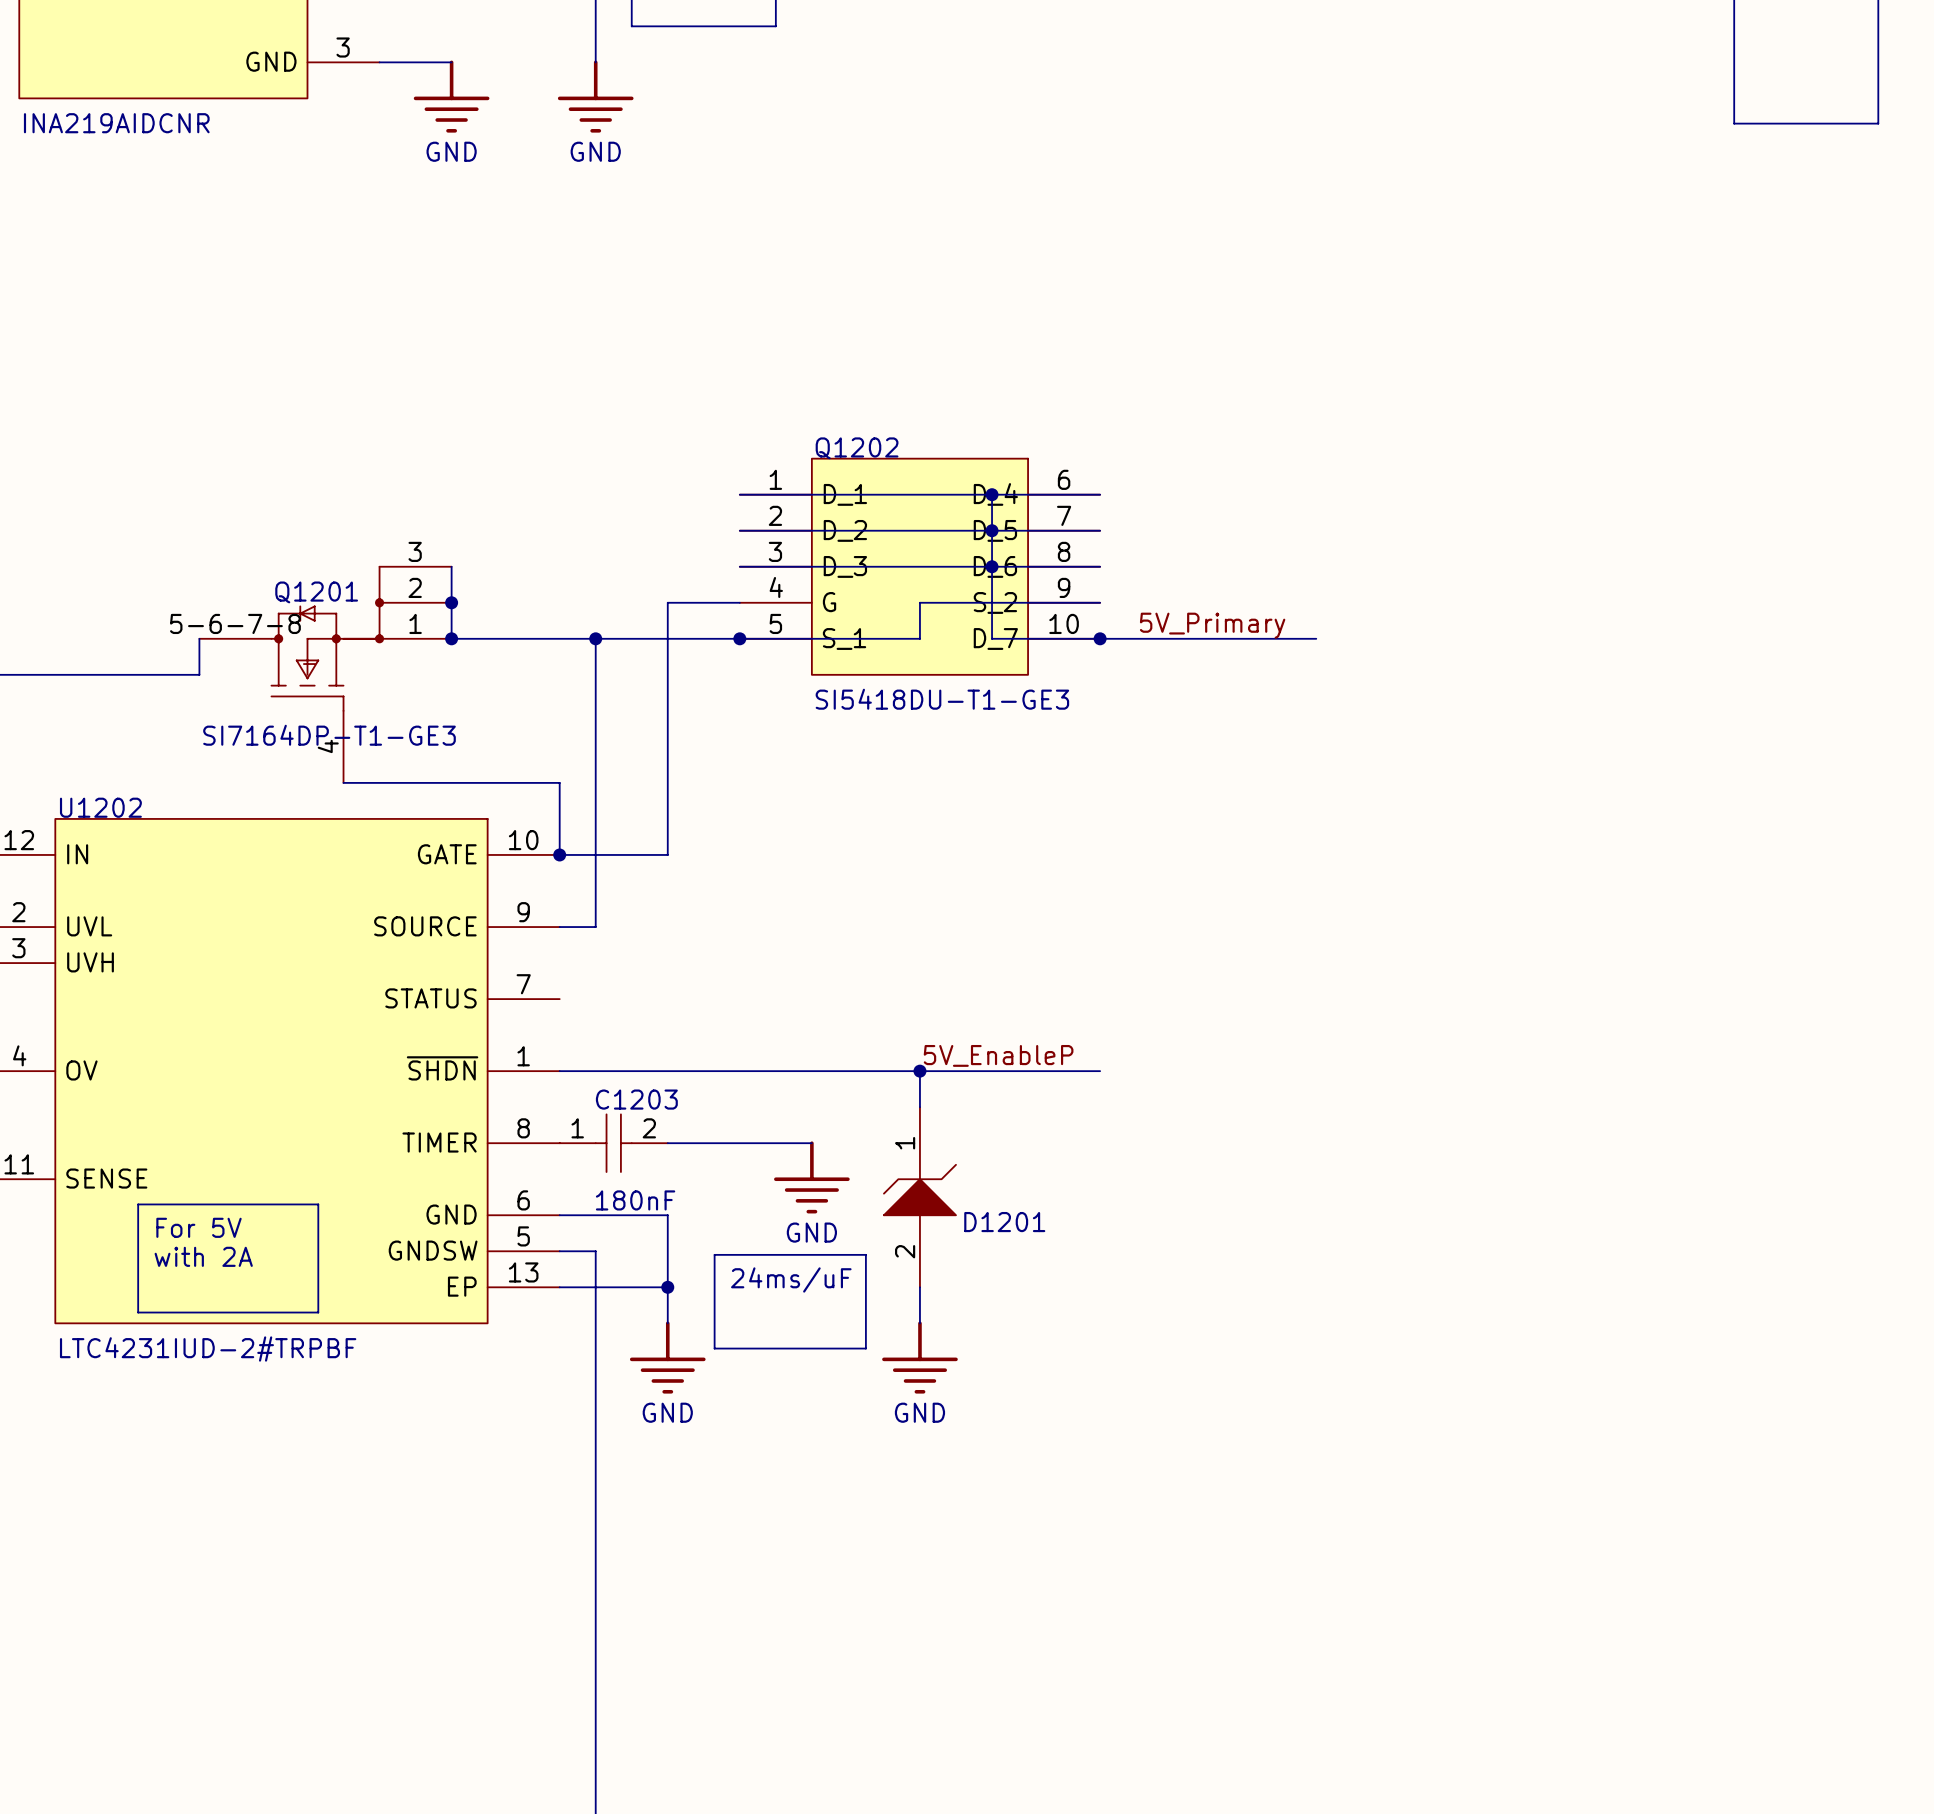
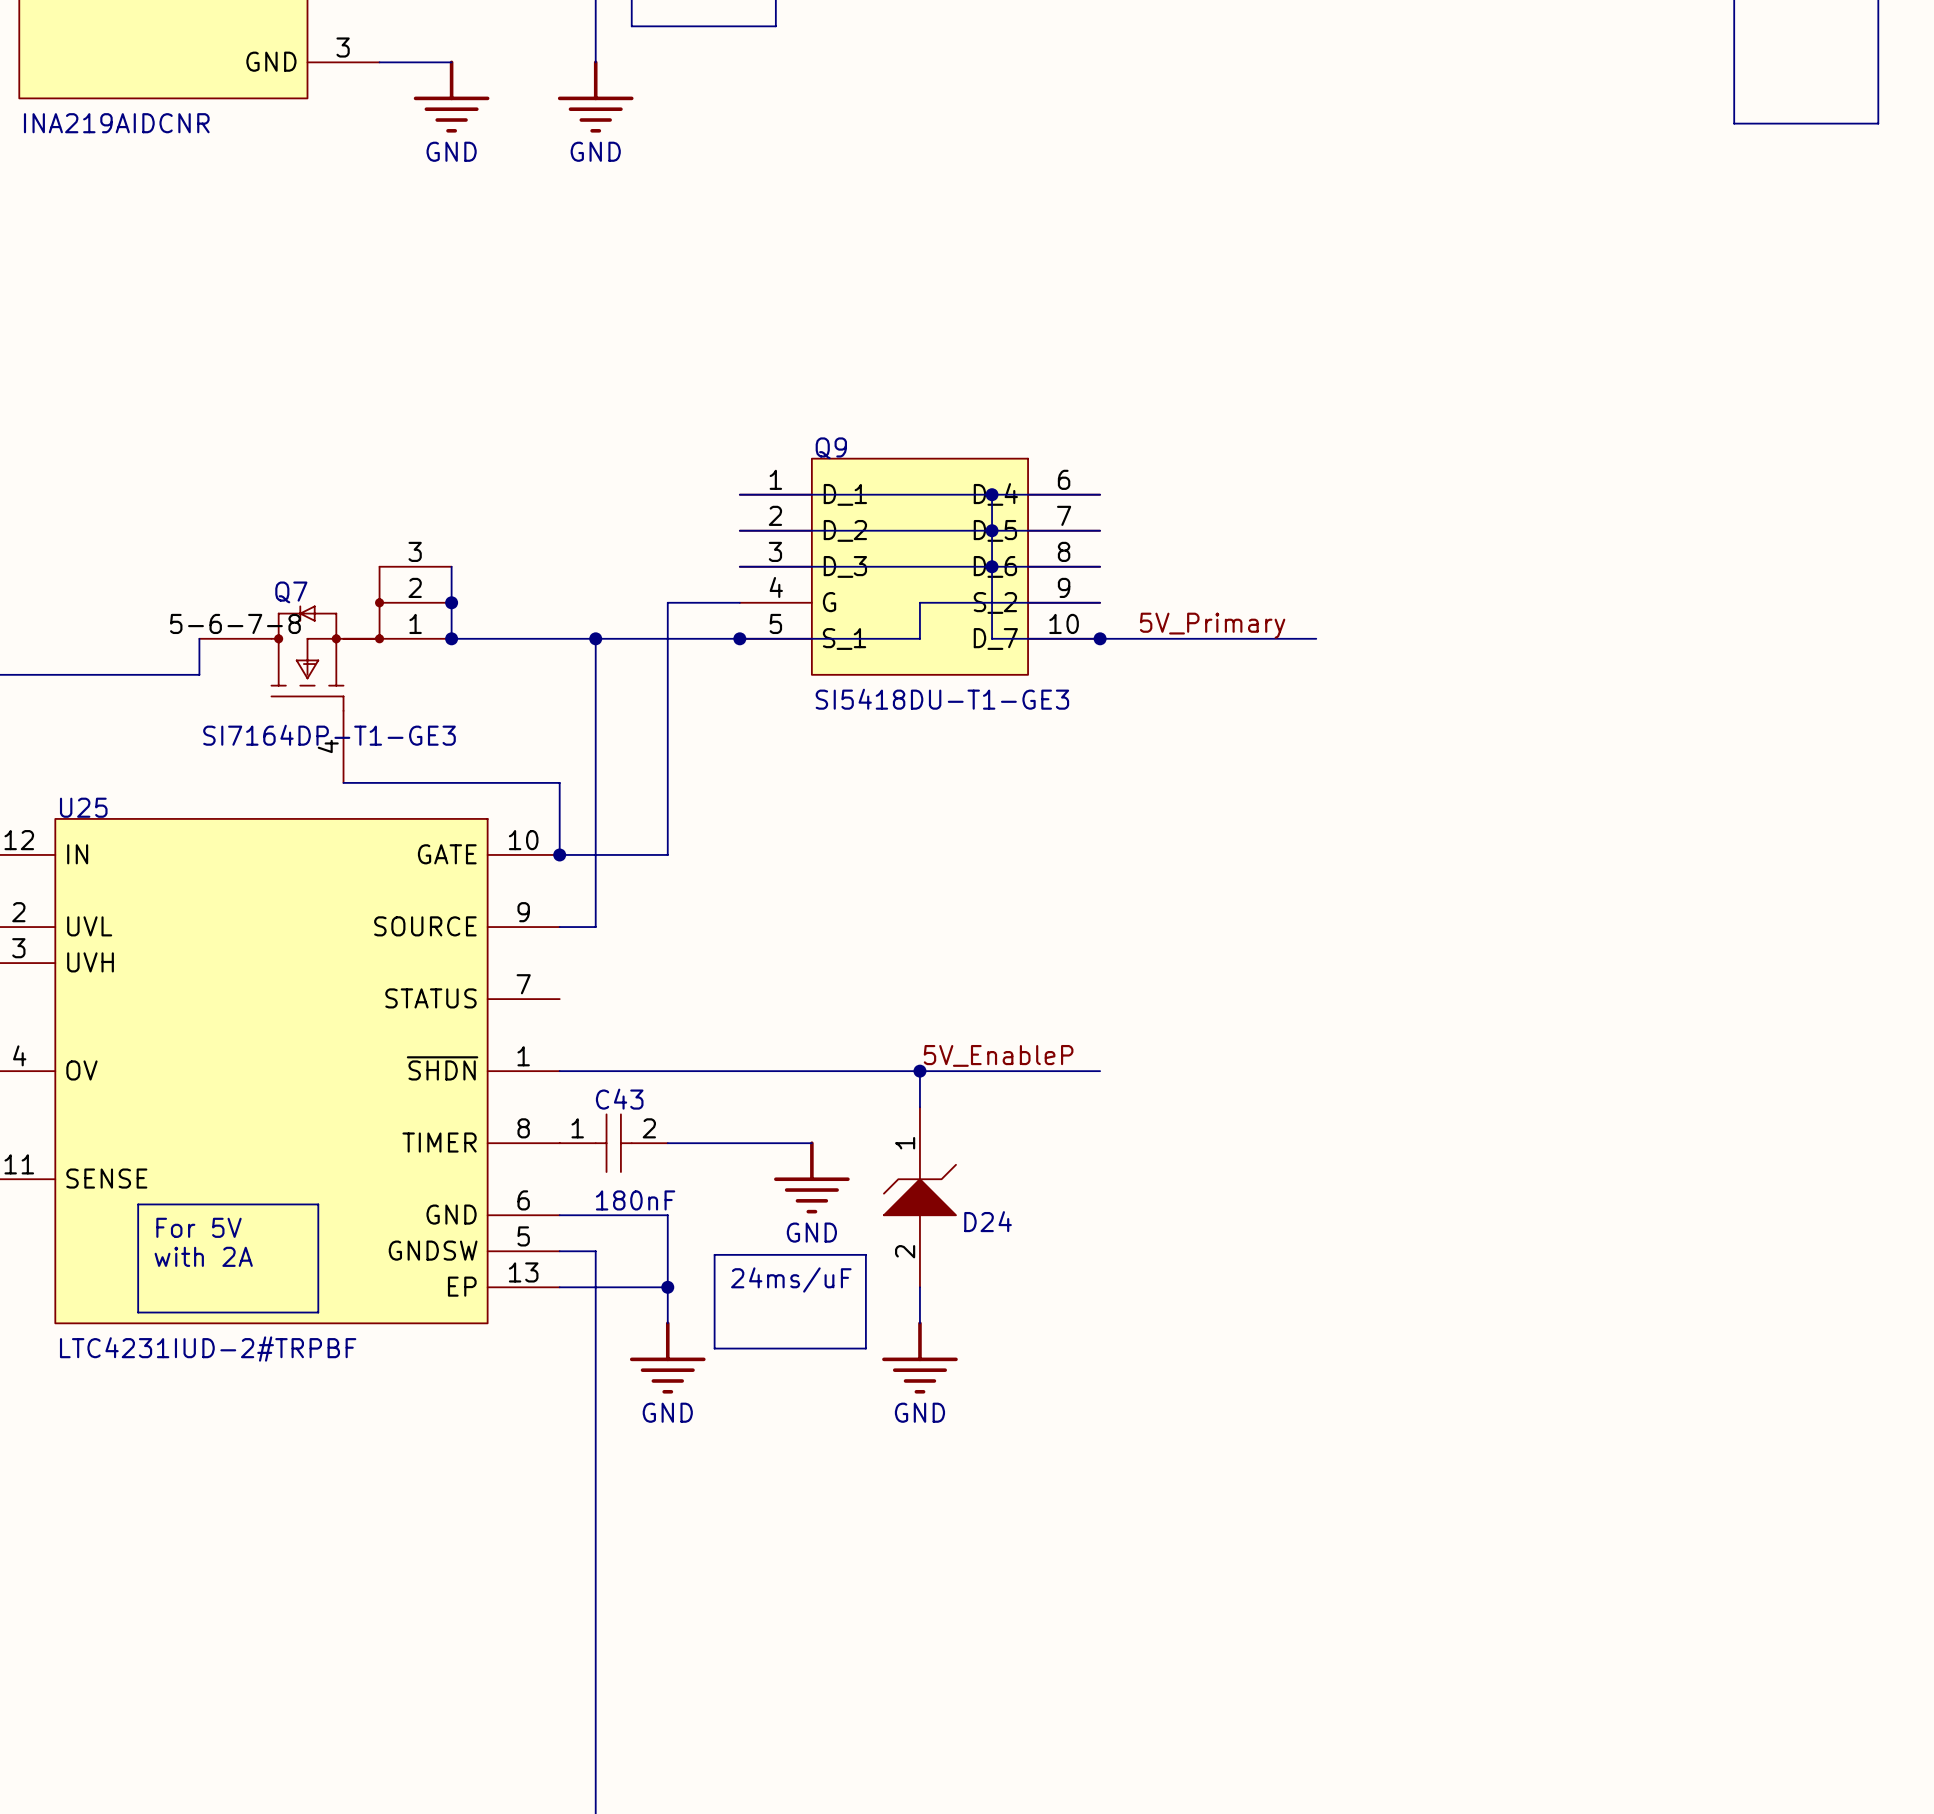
Q1202 name: Q1202 (857, 448) -> Q9 (831, 448)
Q1201 name: Q1201 (316, 592) -> Q7 (291, 592)
U1202 name: U1202 (100, 807) -> U25 (83, 807)
C1203 name: C1203 (636, 1099) -> C43 (619, 1099)
D1201 name: D1201 (1004, 1222) -> D24 (988, 1221)

